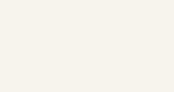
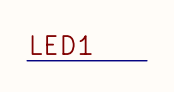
label: none -> LED1 (61, 45)
wire: none -> (27, 60) (146, 60)

